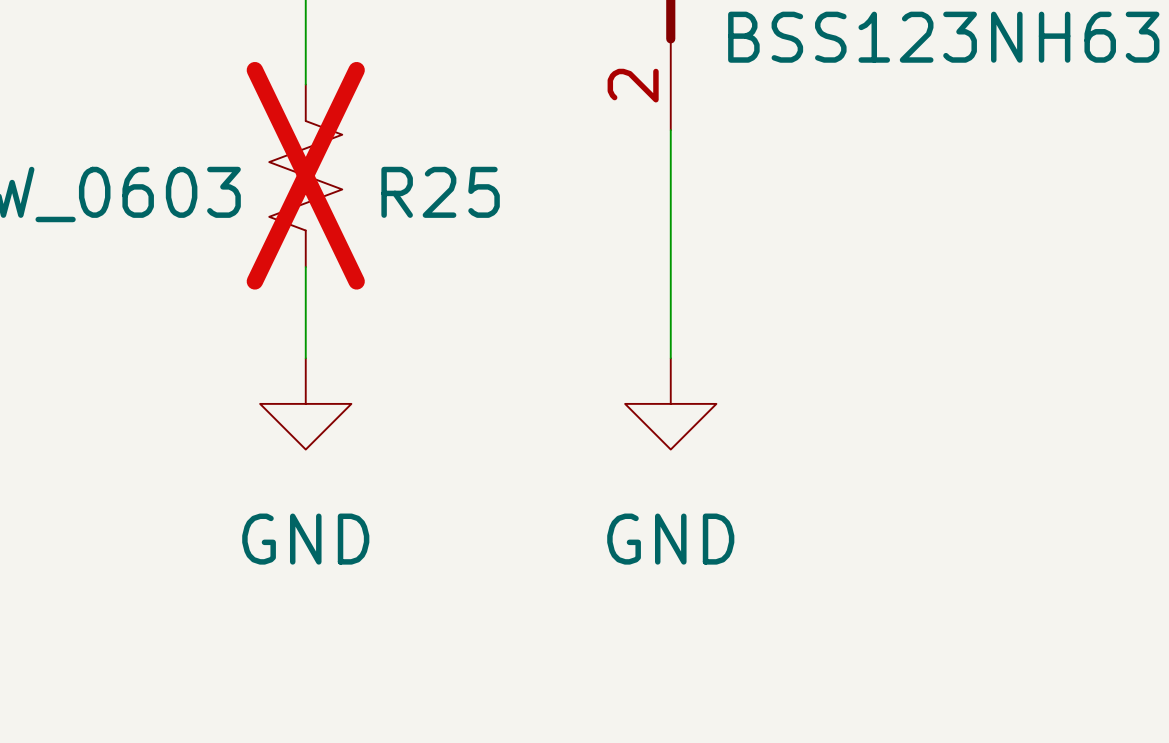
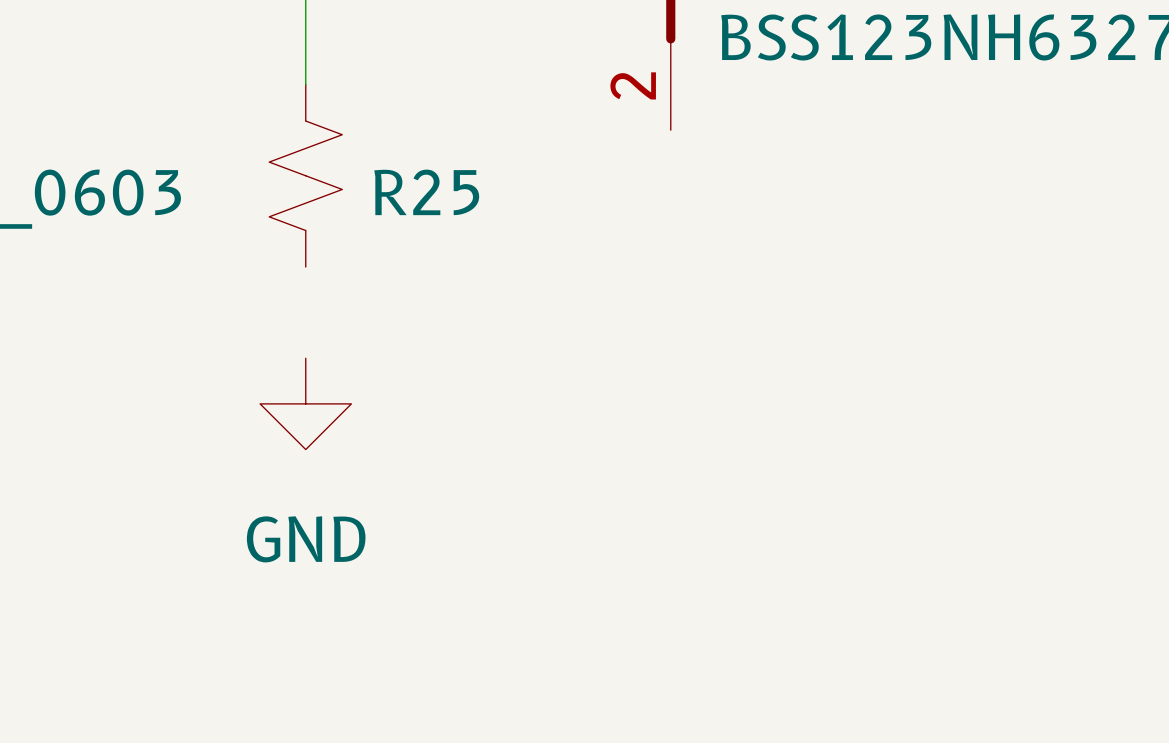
wire: (670, 130) (670, 358) -> none
R25 do-not-place cross: (305, 175) -> none
wire: (305, 267) (305, 358) -> none
power symbol: GND (670, 403) -> none

